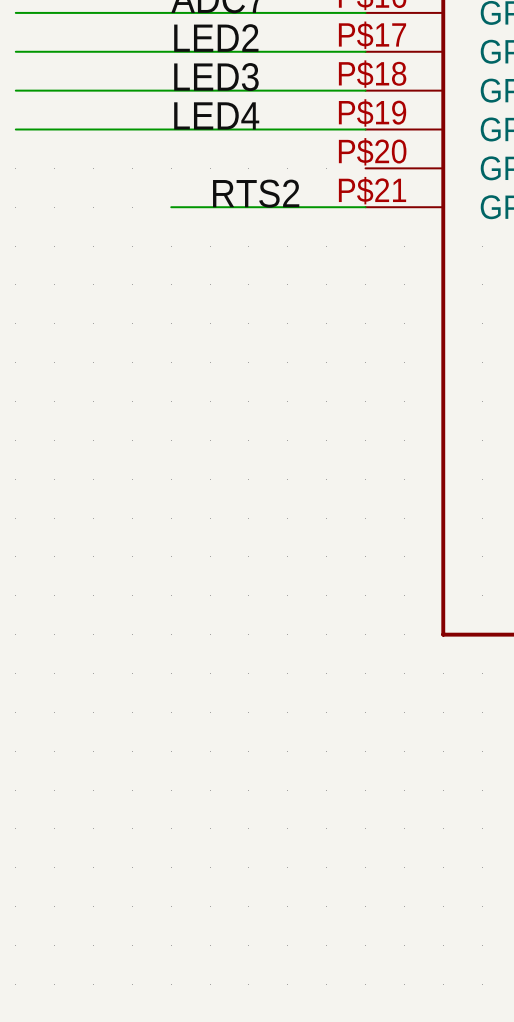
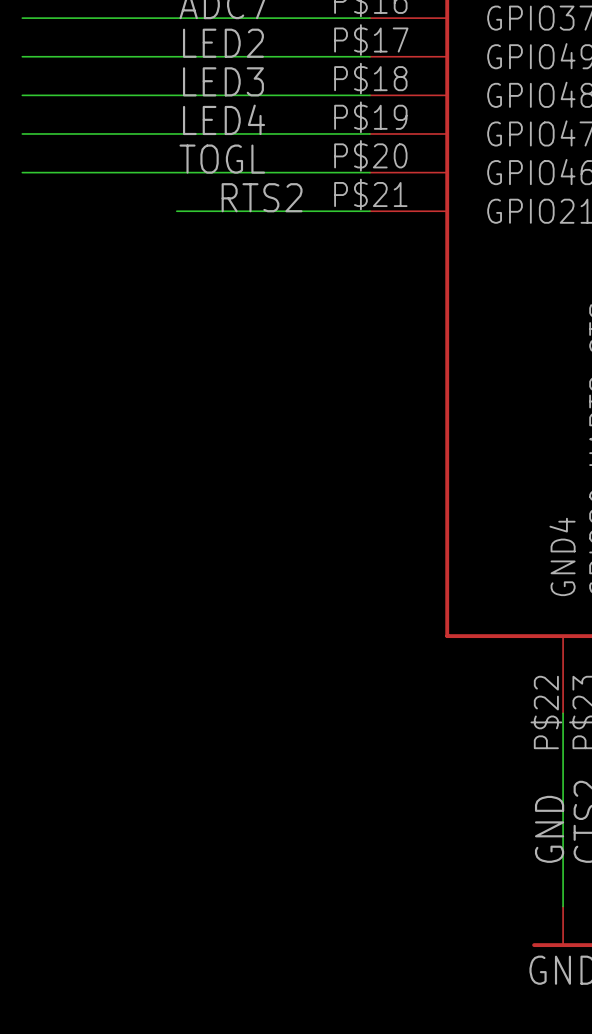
label: none -> TOGL (222, 159)
wire: none -> (22, 172) (369, 172)

